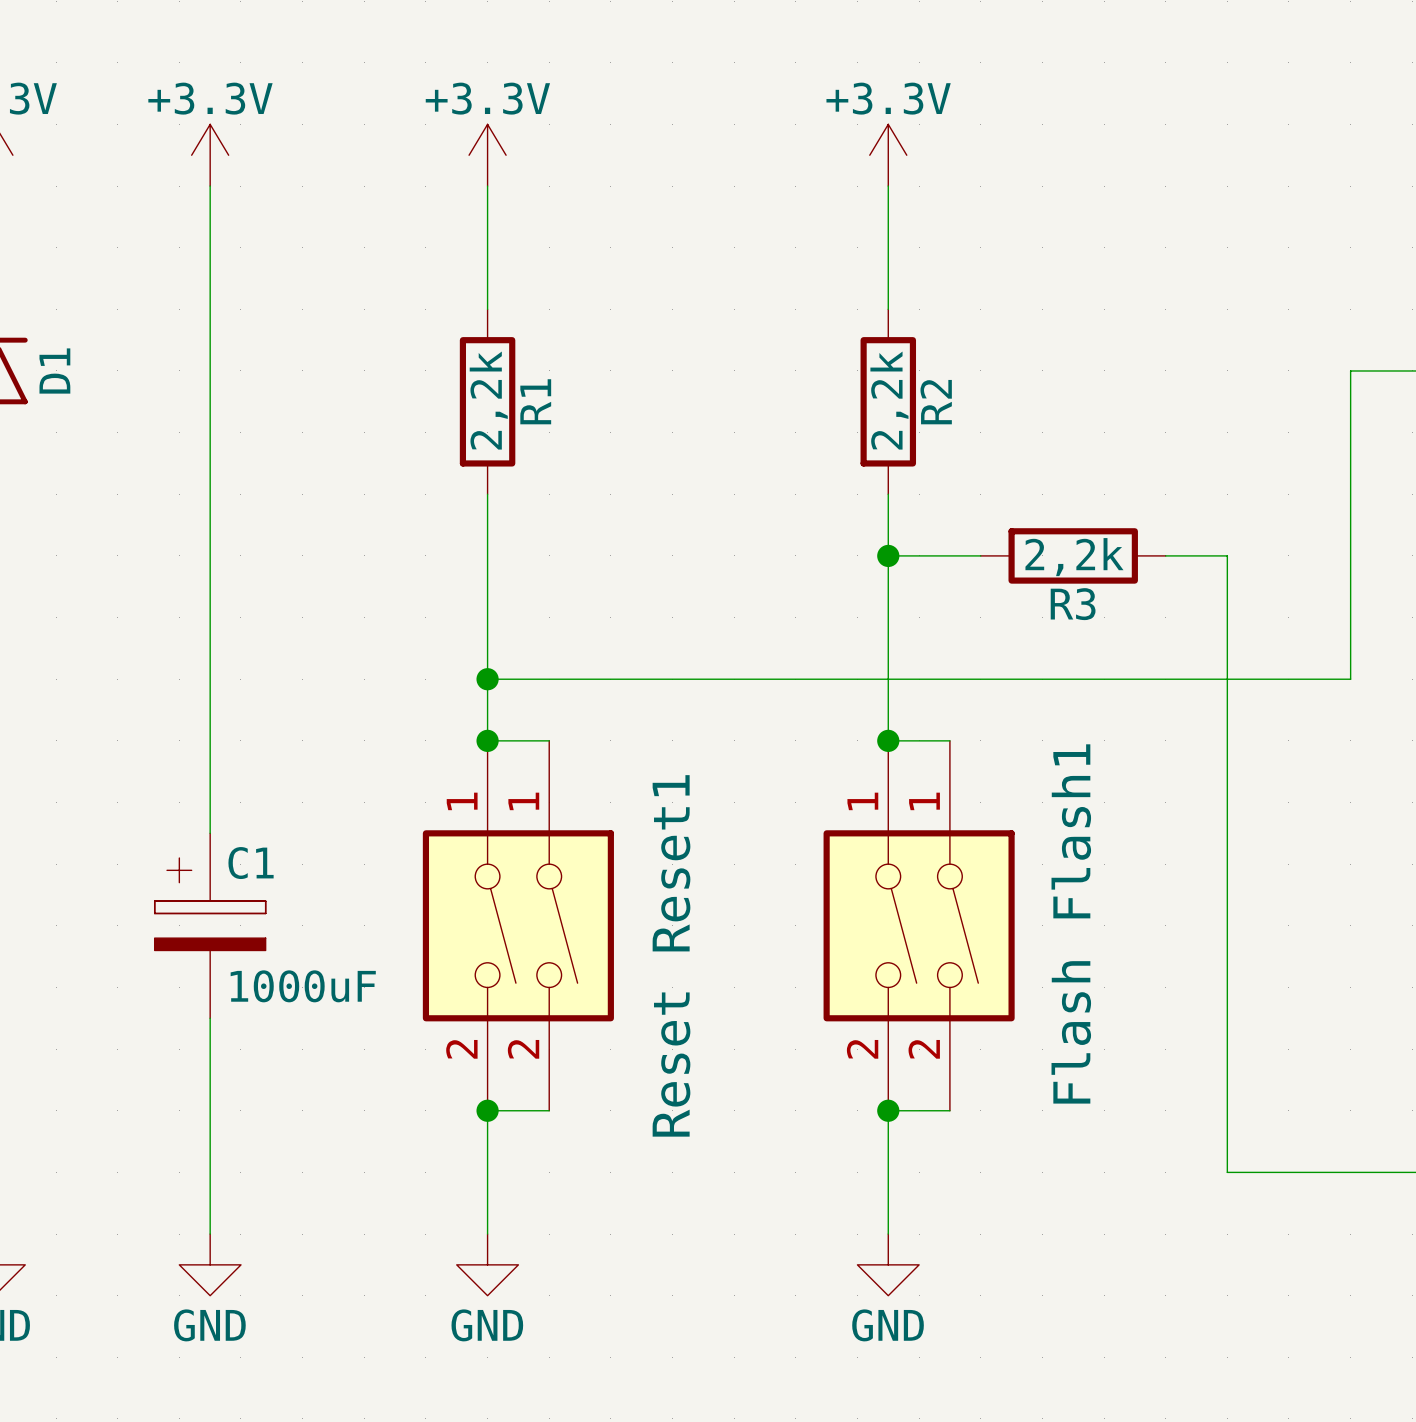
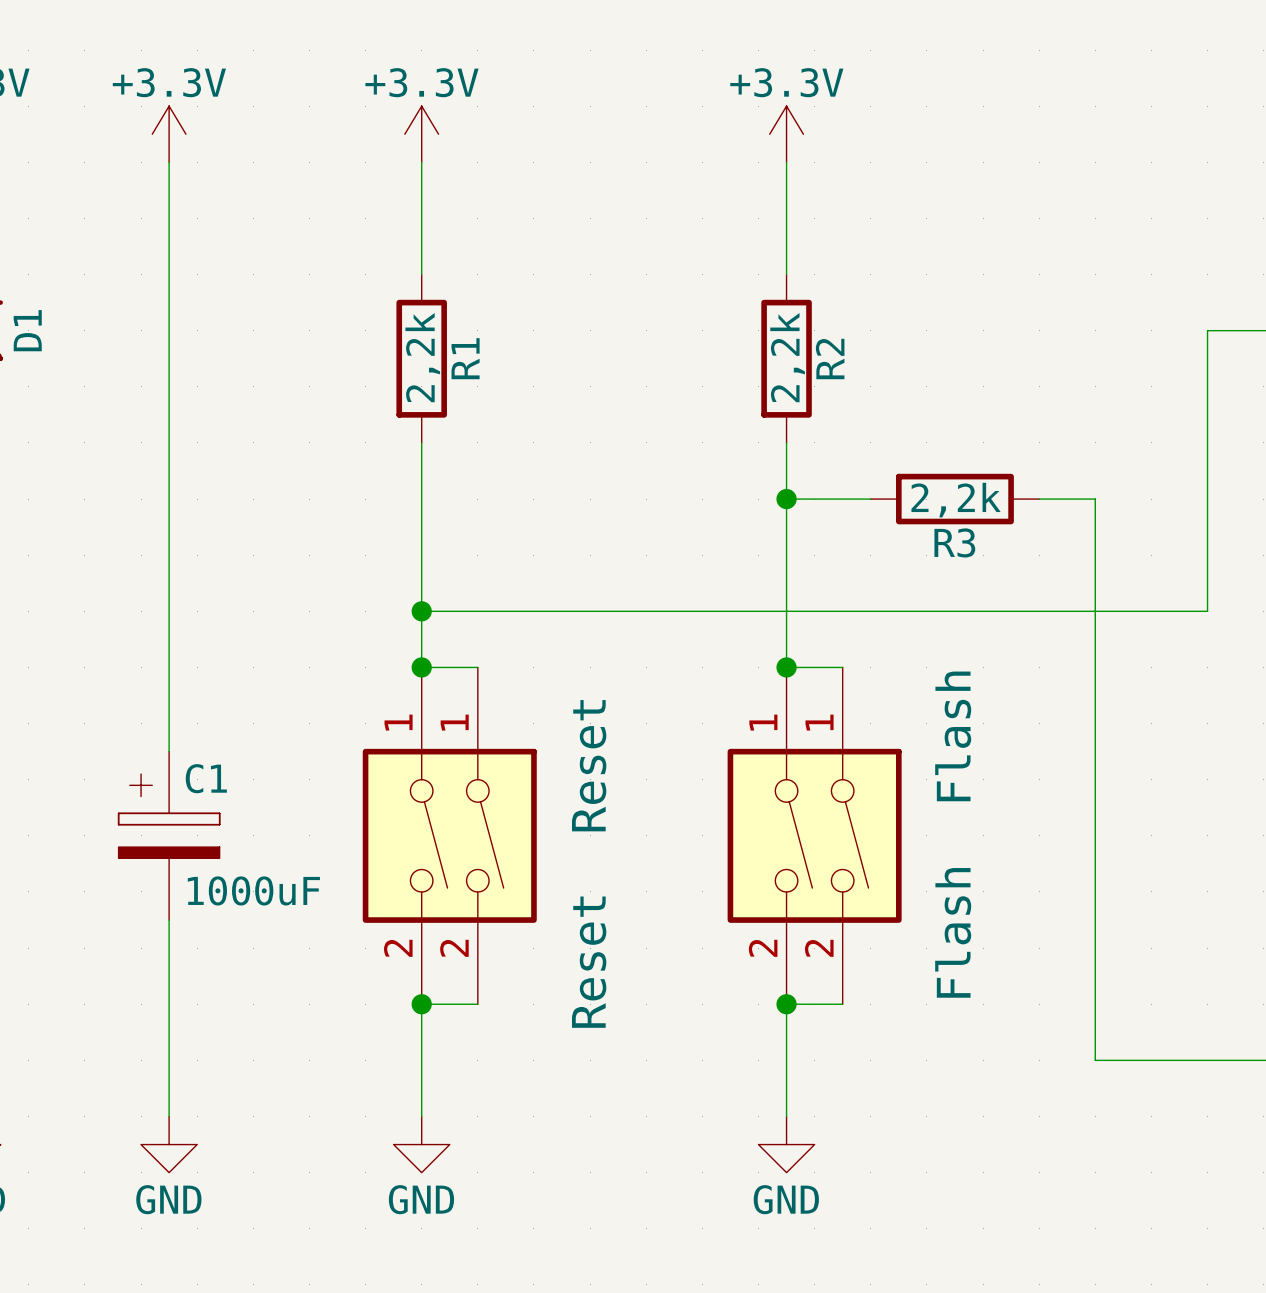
Flash1 name: Flash1 (1071, 831) -> Flash (953, 736)
Reset1 name: Reset1 (671, 863) -> Reset (589, 765)

